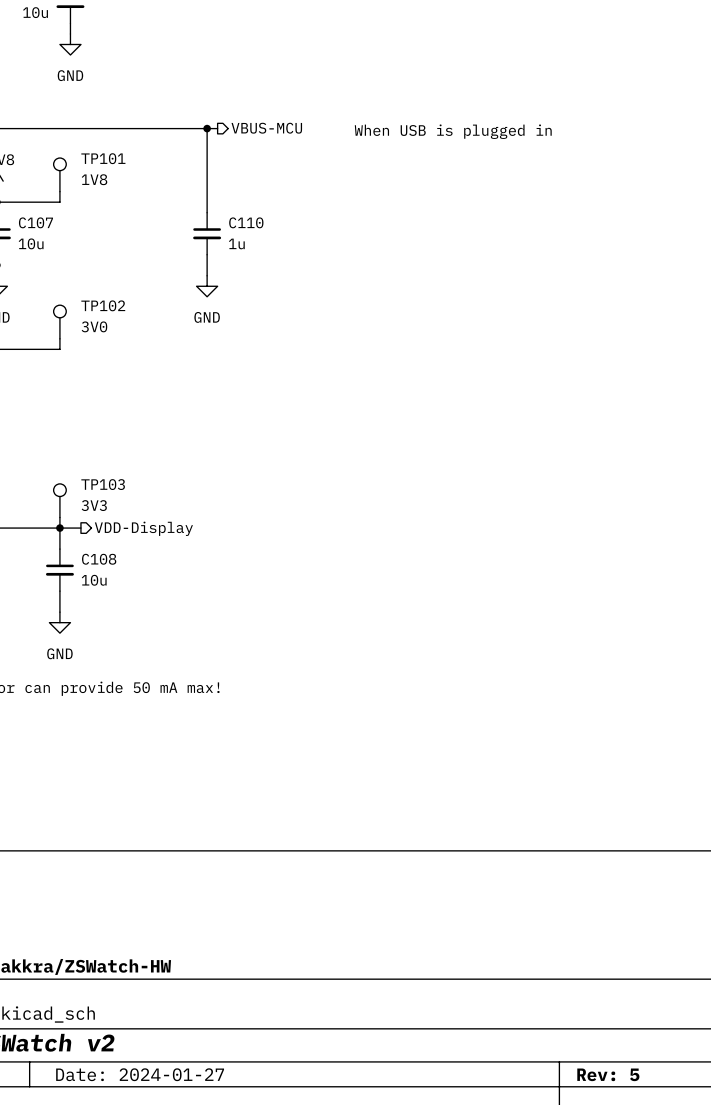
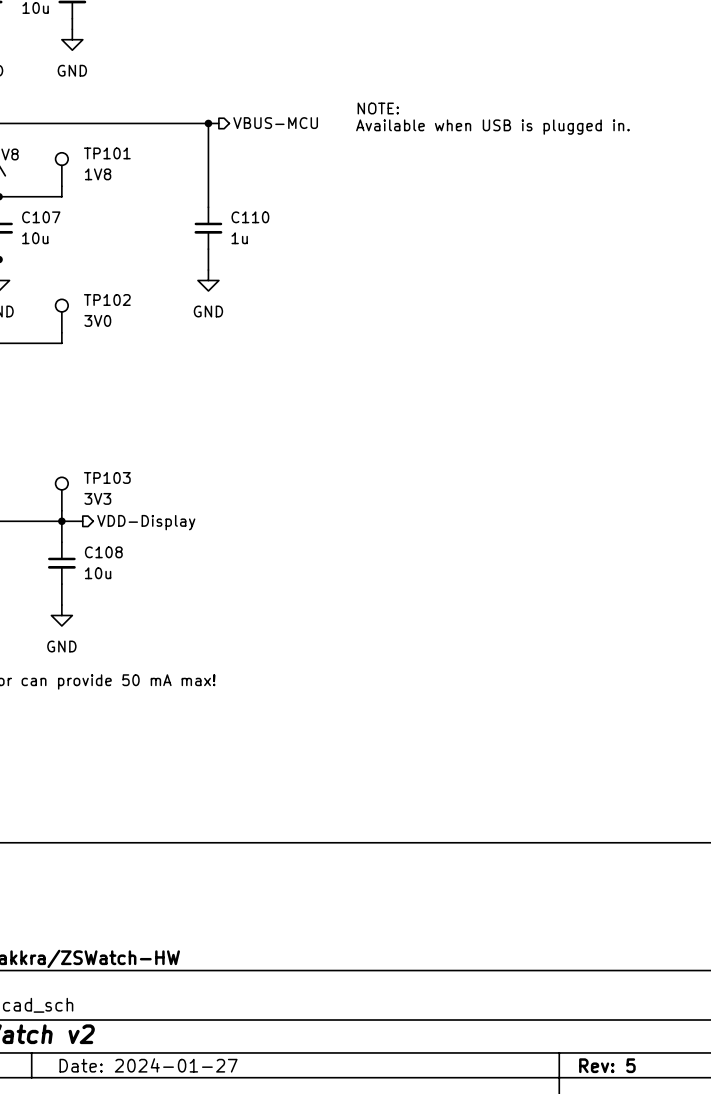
text: none -> NOTE: (378, 108)
text: When USB is plugged in (453, 131) -> Available when USB is plugged in. (492, 127)

